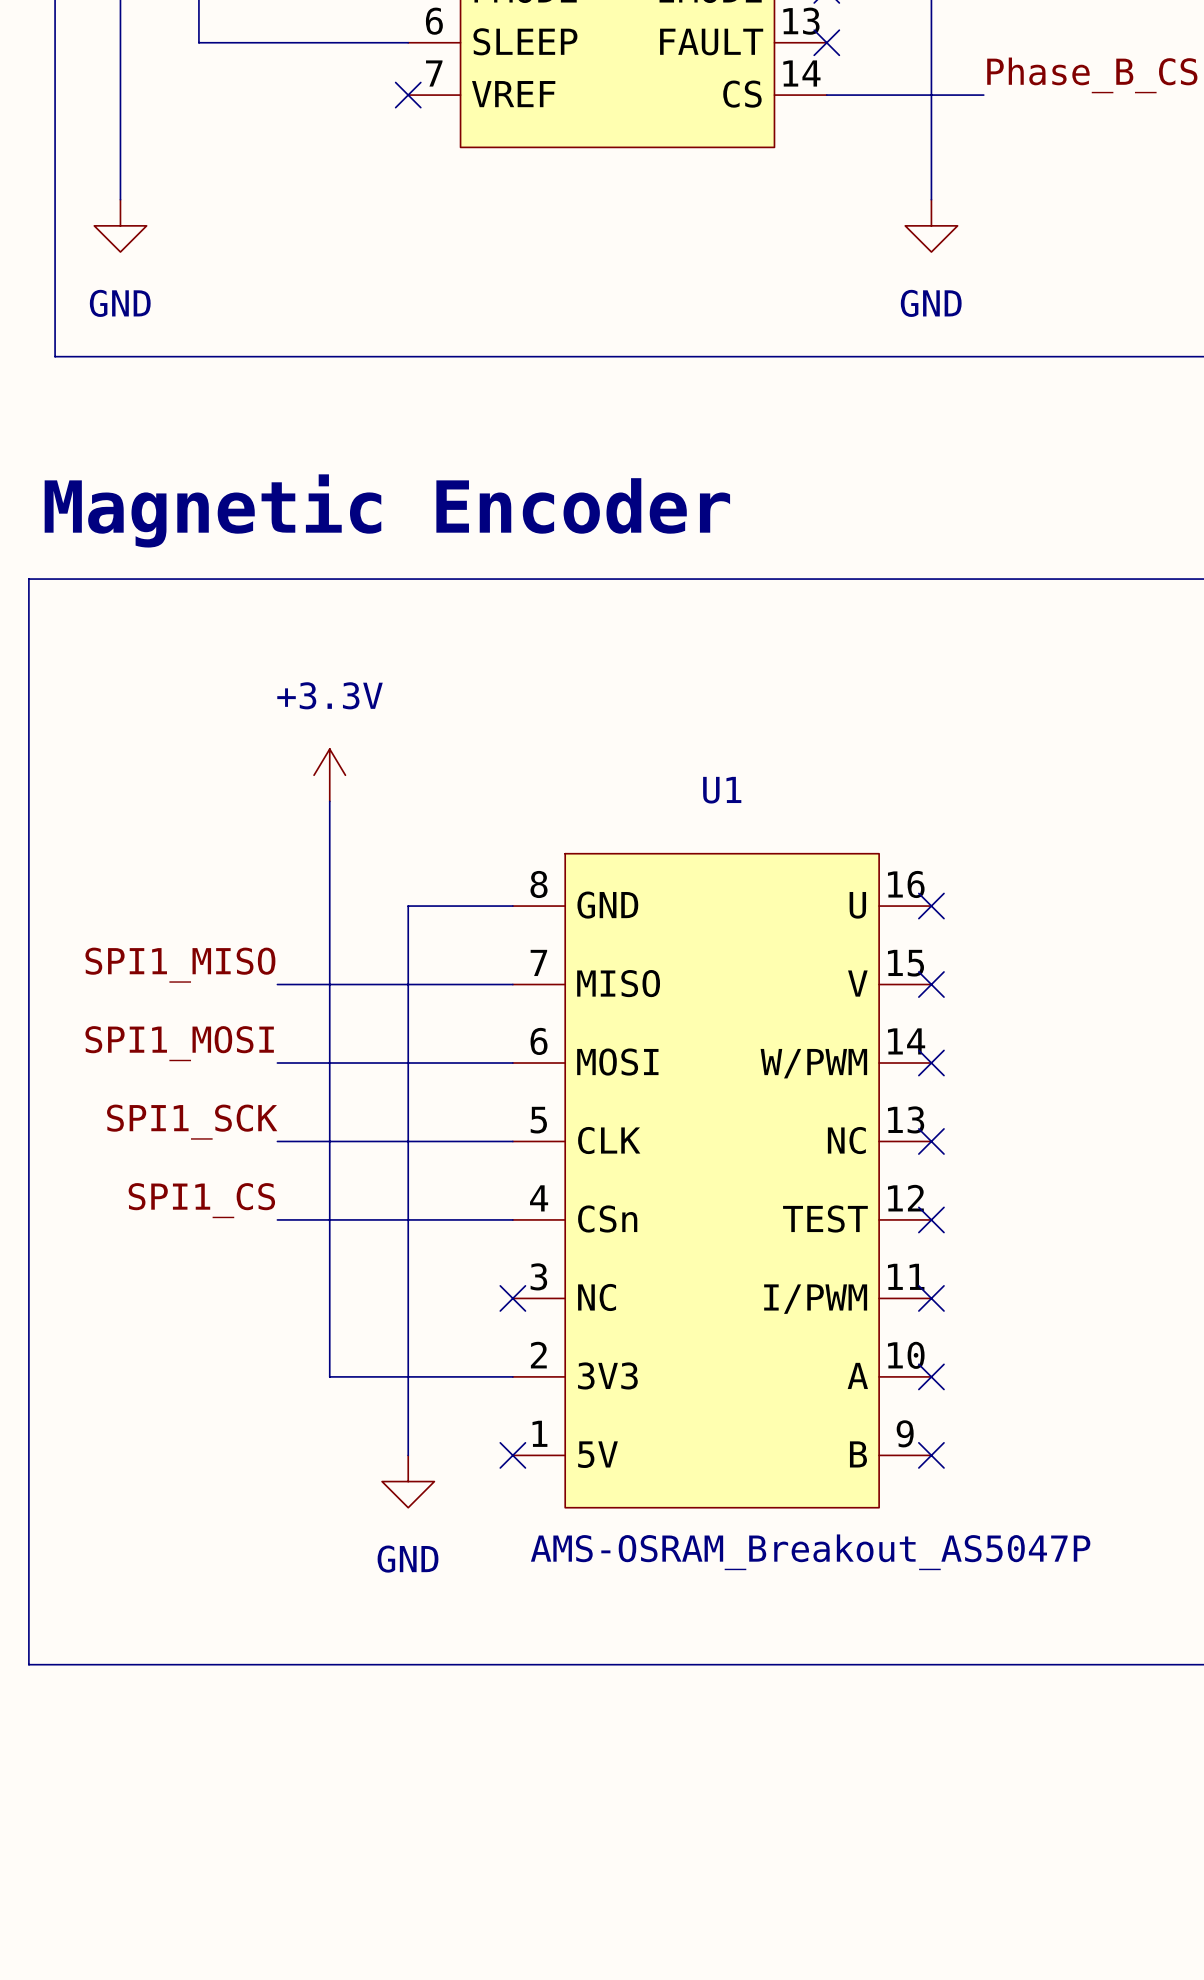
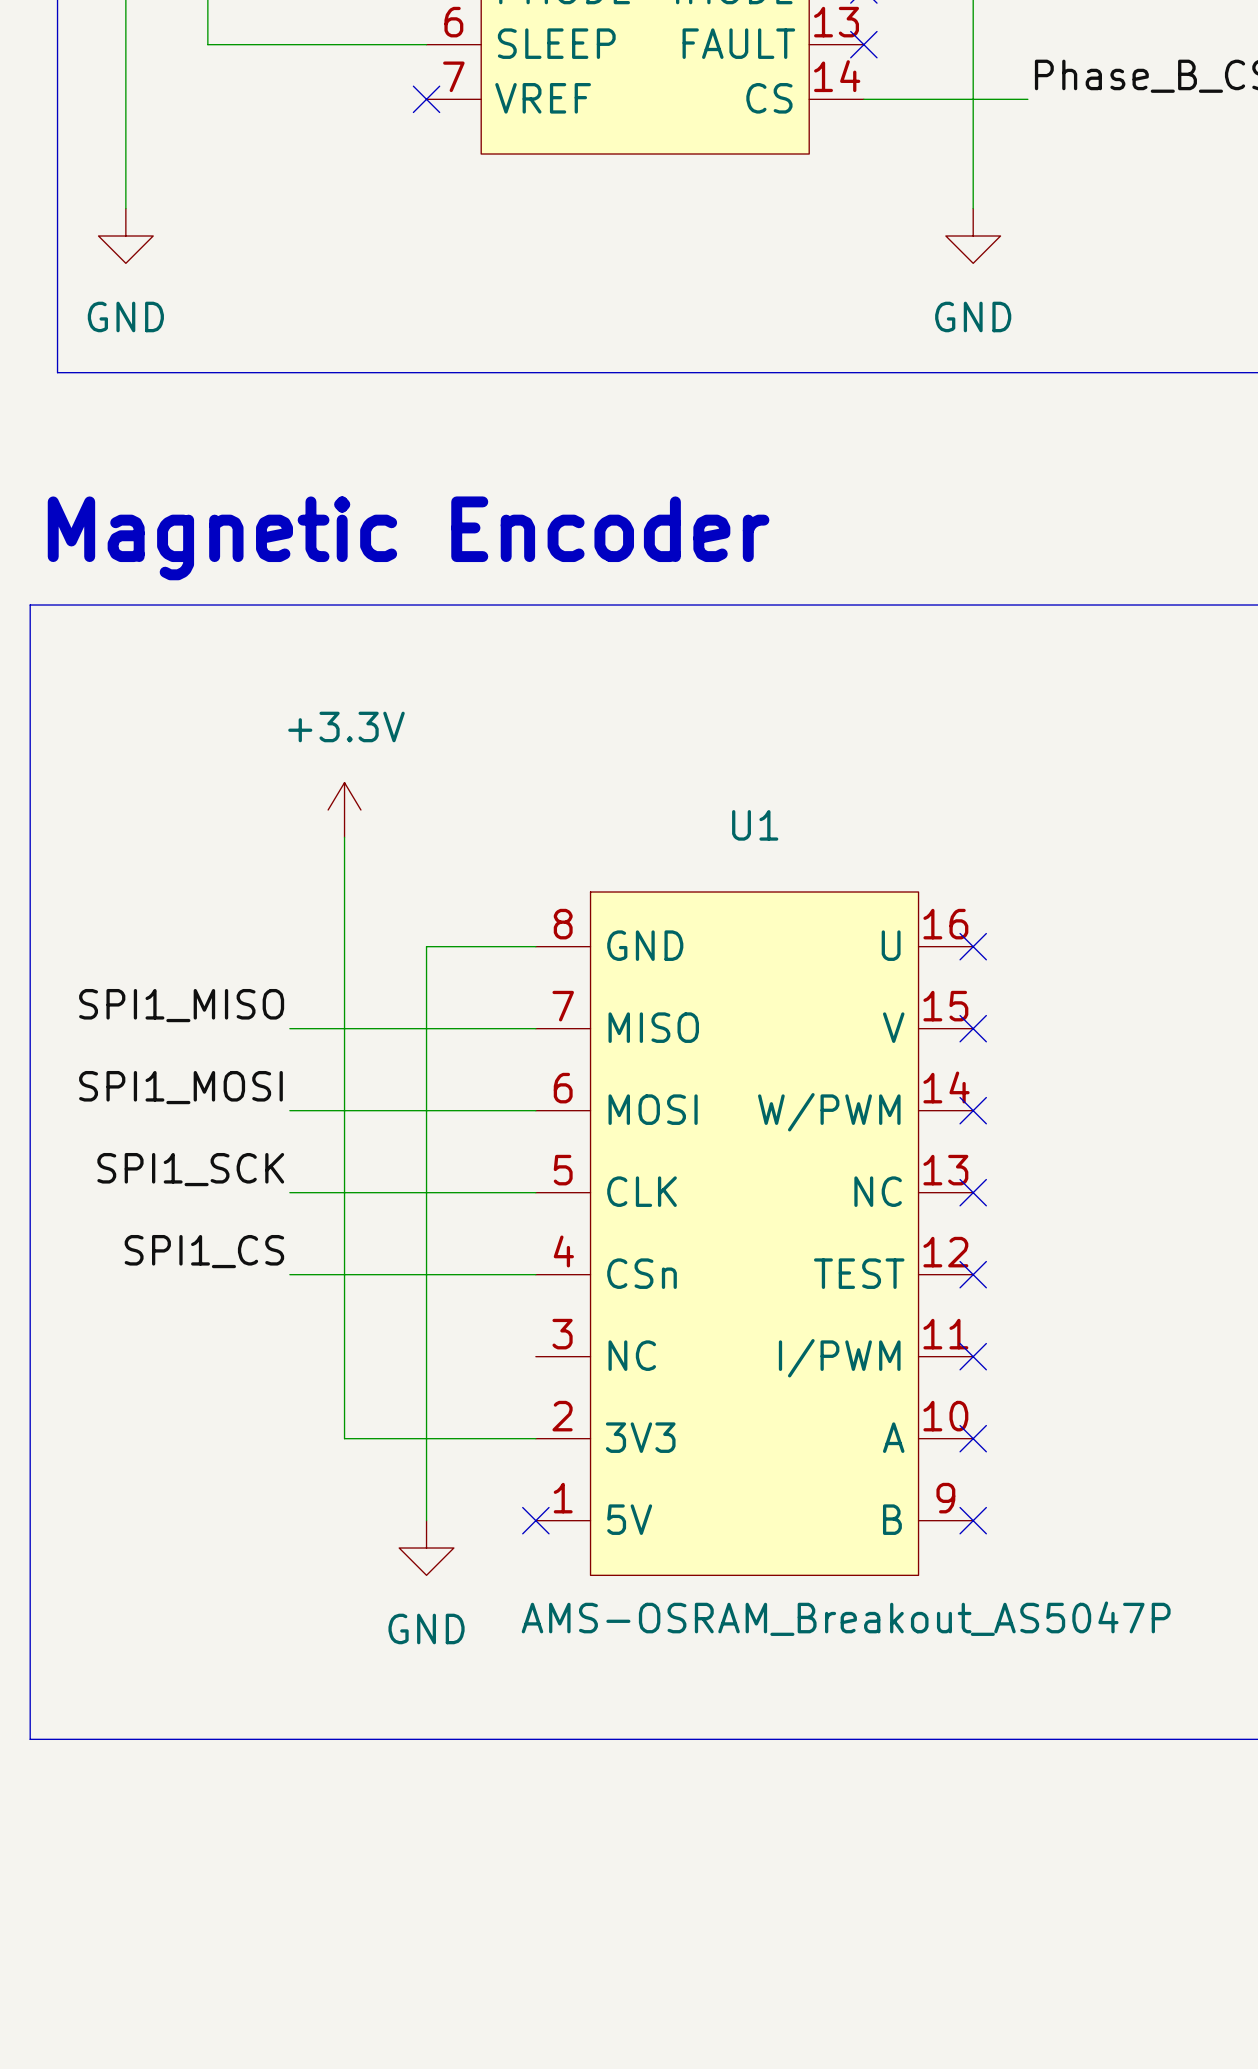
no-connect mark: (512, 1298) -> none

